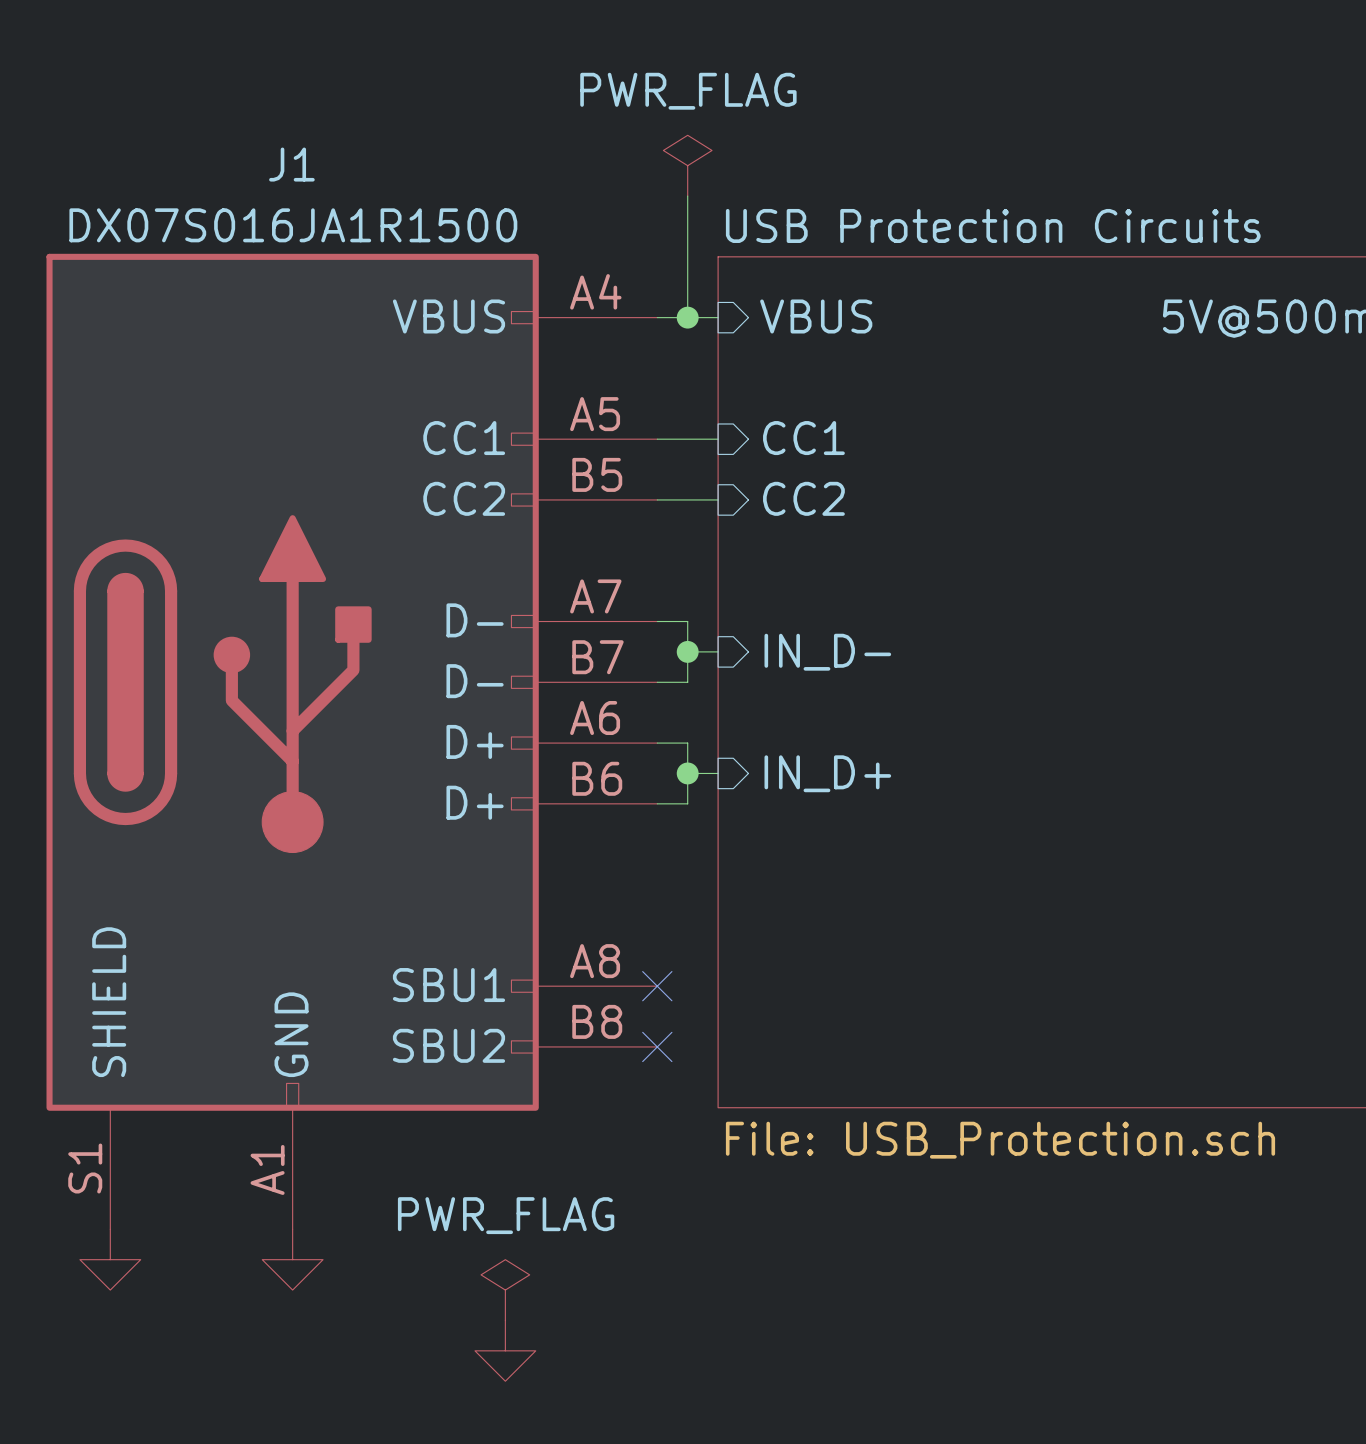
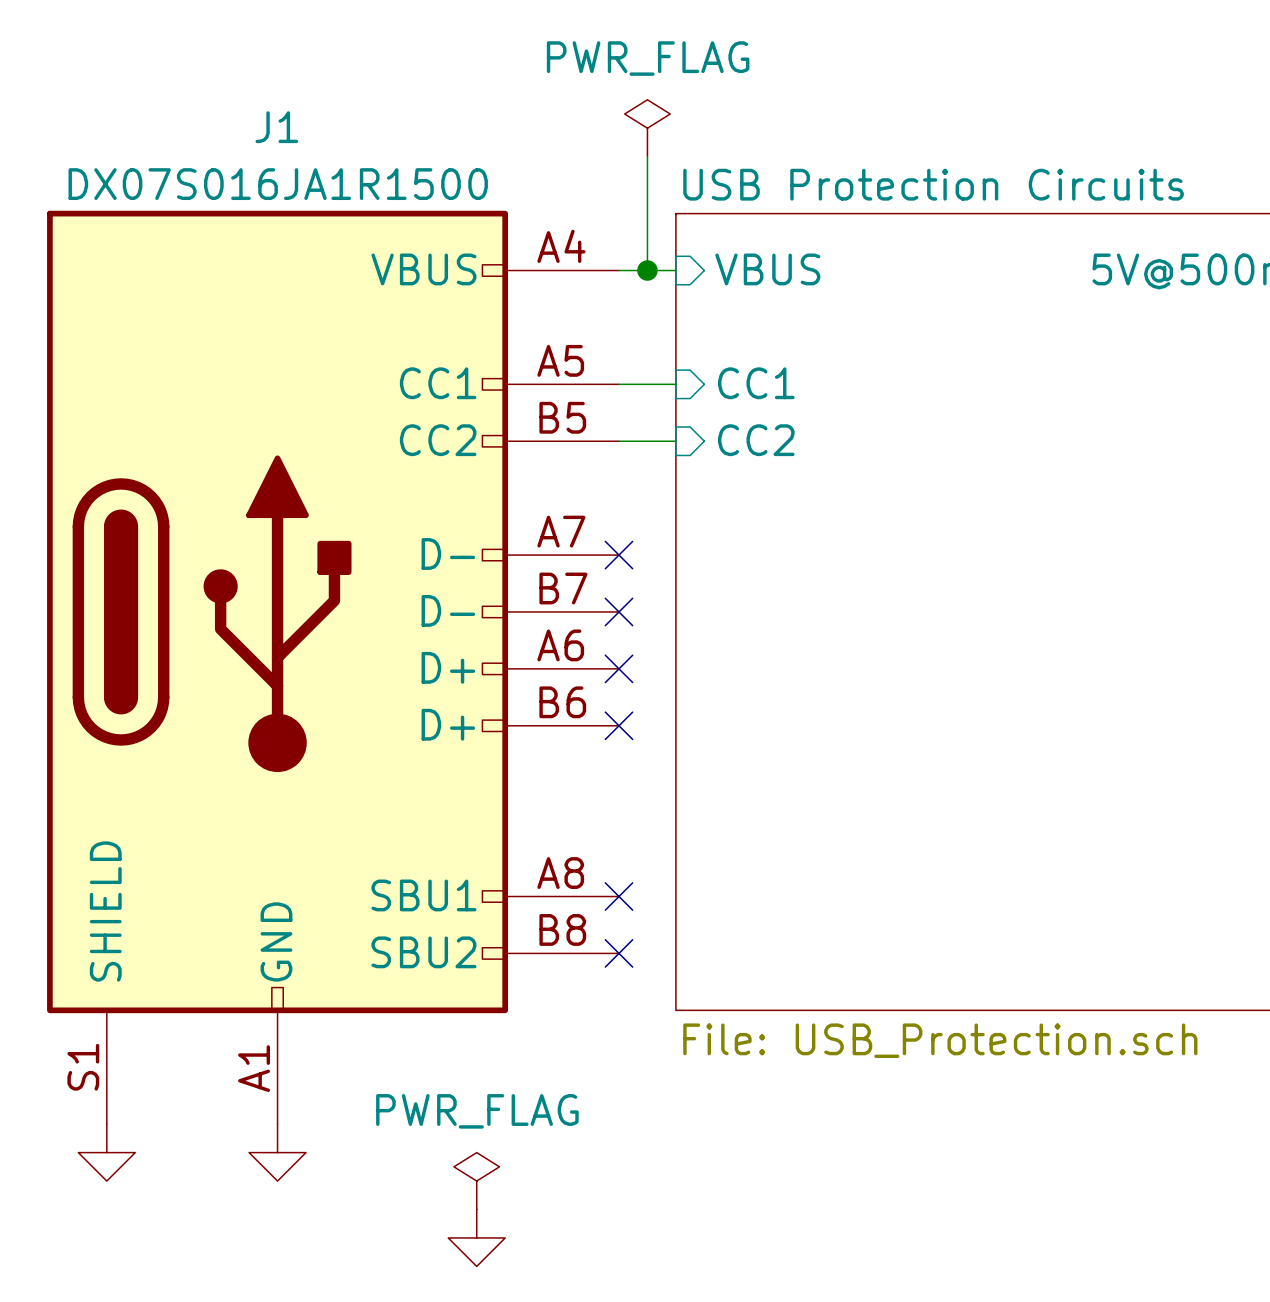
wire: (657, 621) (687, 621) (687, 682) (657, 682) -> none
no-connect mark: none -> (619, 555)
wire: (687, 651) (718, 651) -> none
junction: (687, 651) -> none
sheet pin: IN_D- (827, 652) -> none
no-connect mark: none -> (619, 611)
wire: (657, 743) (687, 743) (687, 803) (657, 803) -> none
no-connect mark: none -> (619, 668)
wire: (687, 773) (718, 773) -> none
junction: (687, 773) -> none
sheet pin: IN_D+ (827, 773) -> none
no-connect mark: none -> (619, 725)

